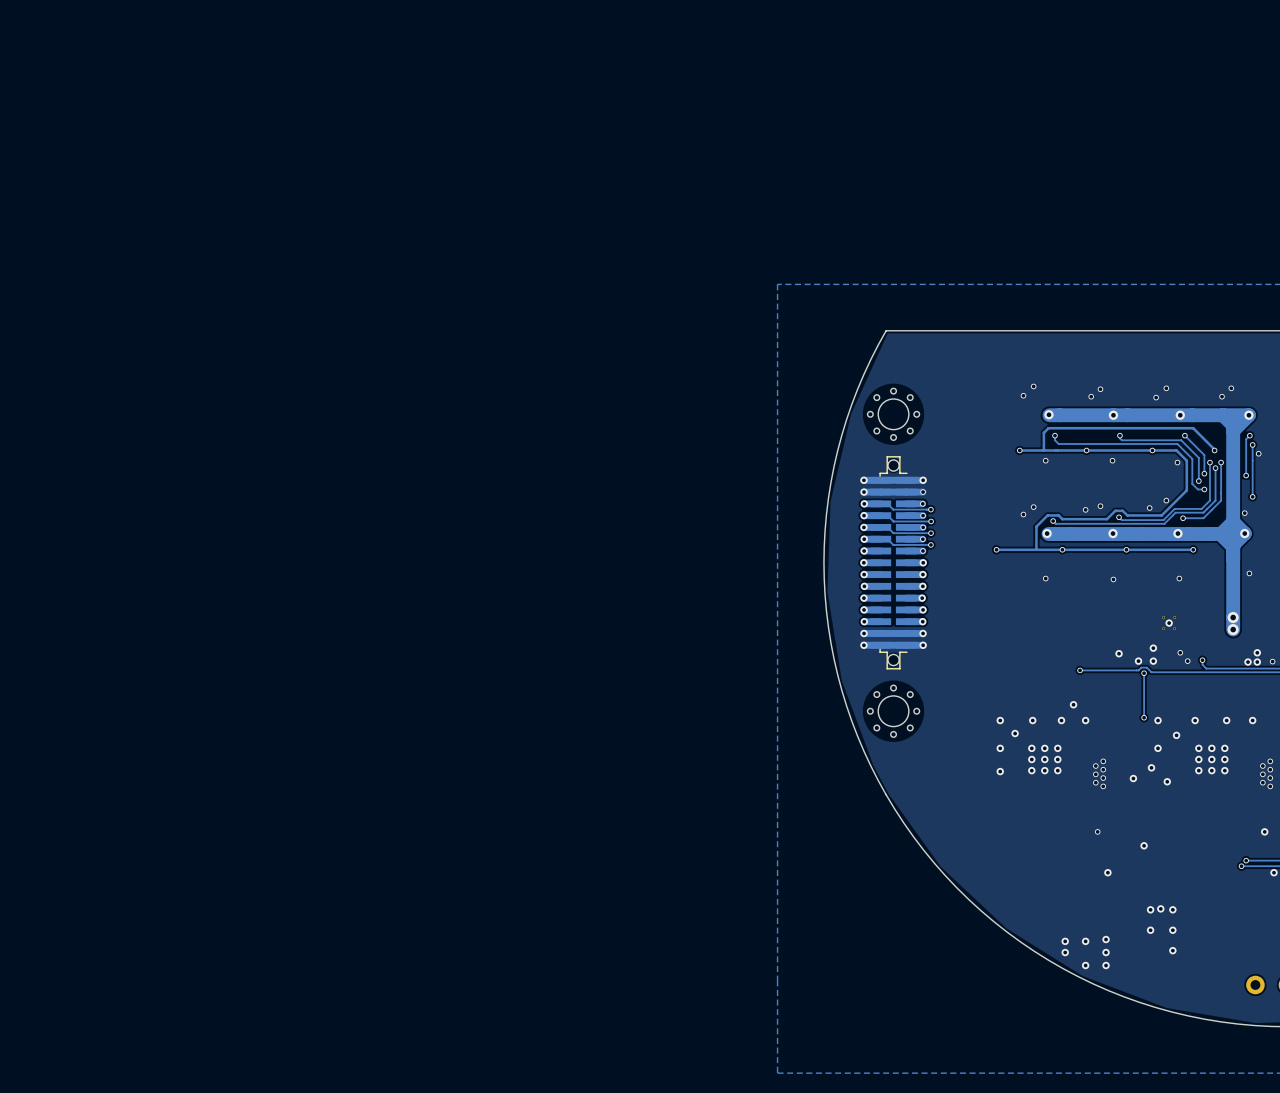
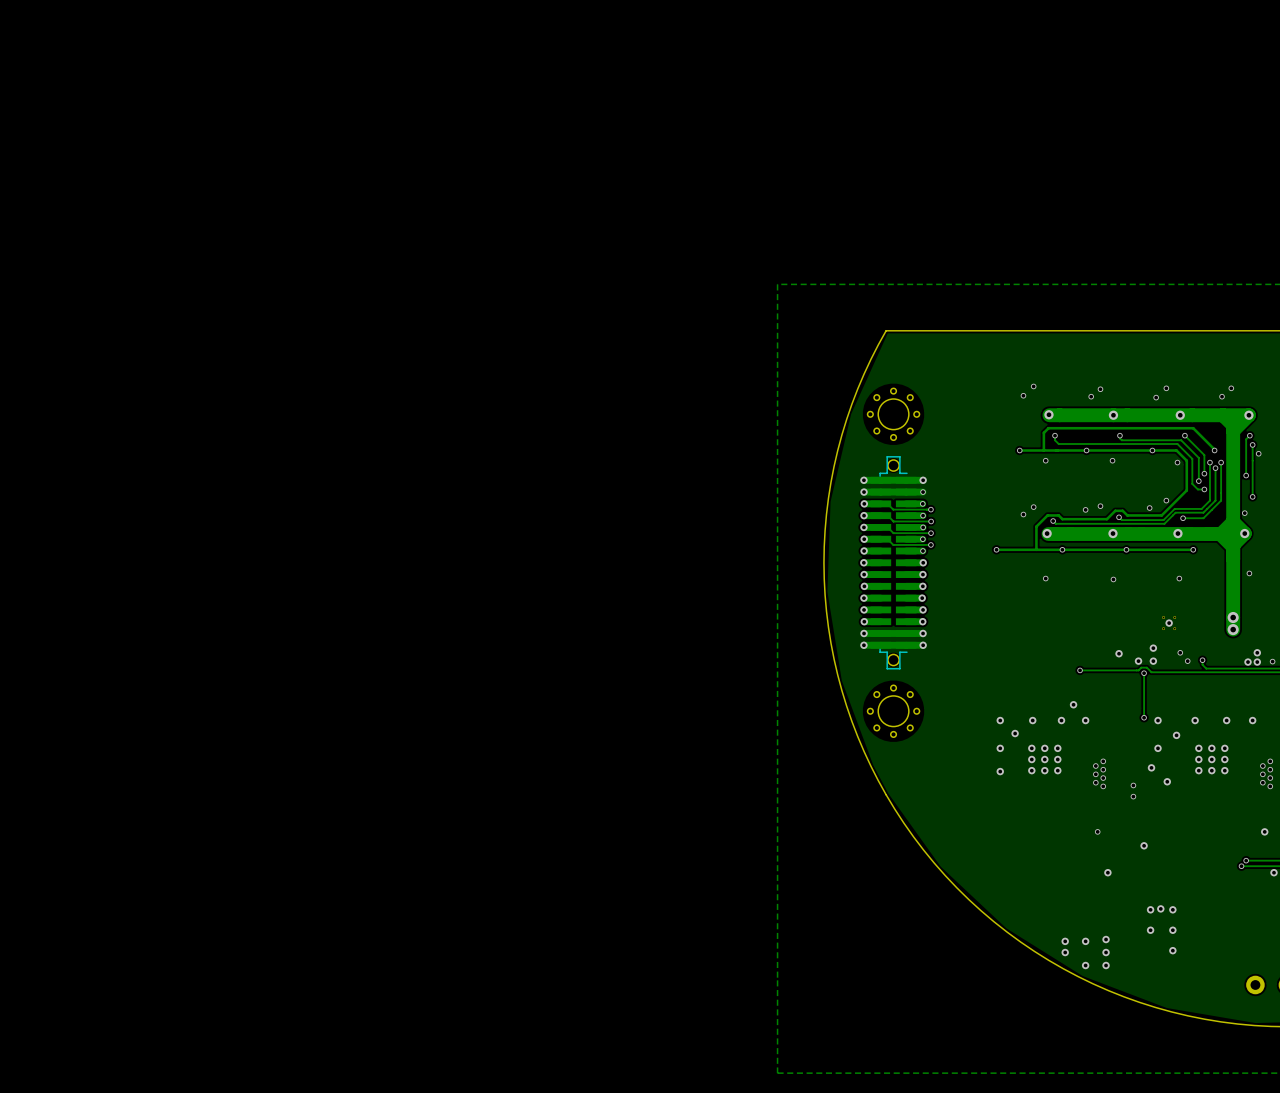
via: (1133, 778) -> none
via: none -> (1133, 785)
via: none -> (1133, 796)

